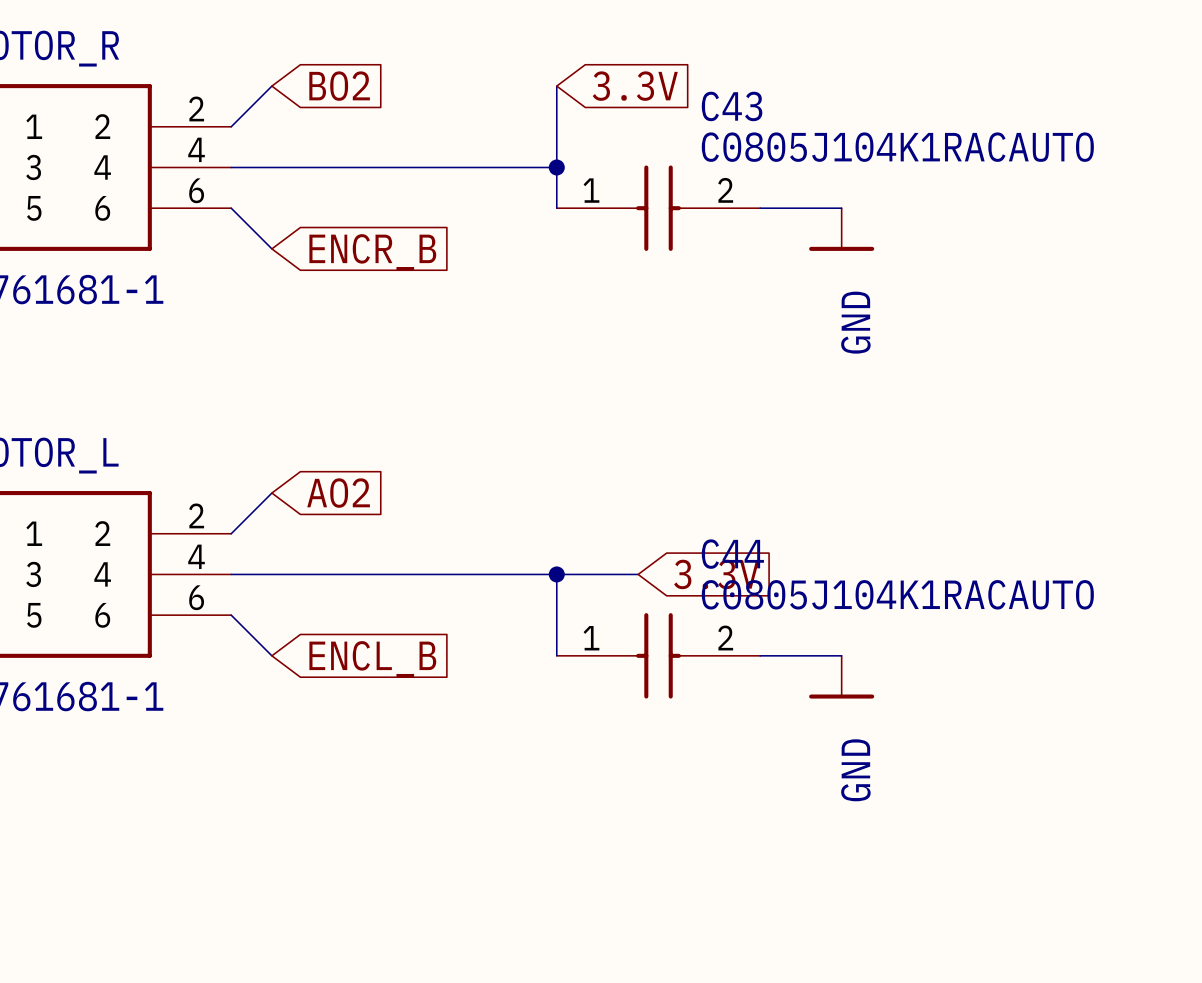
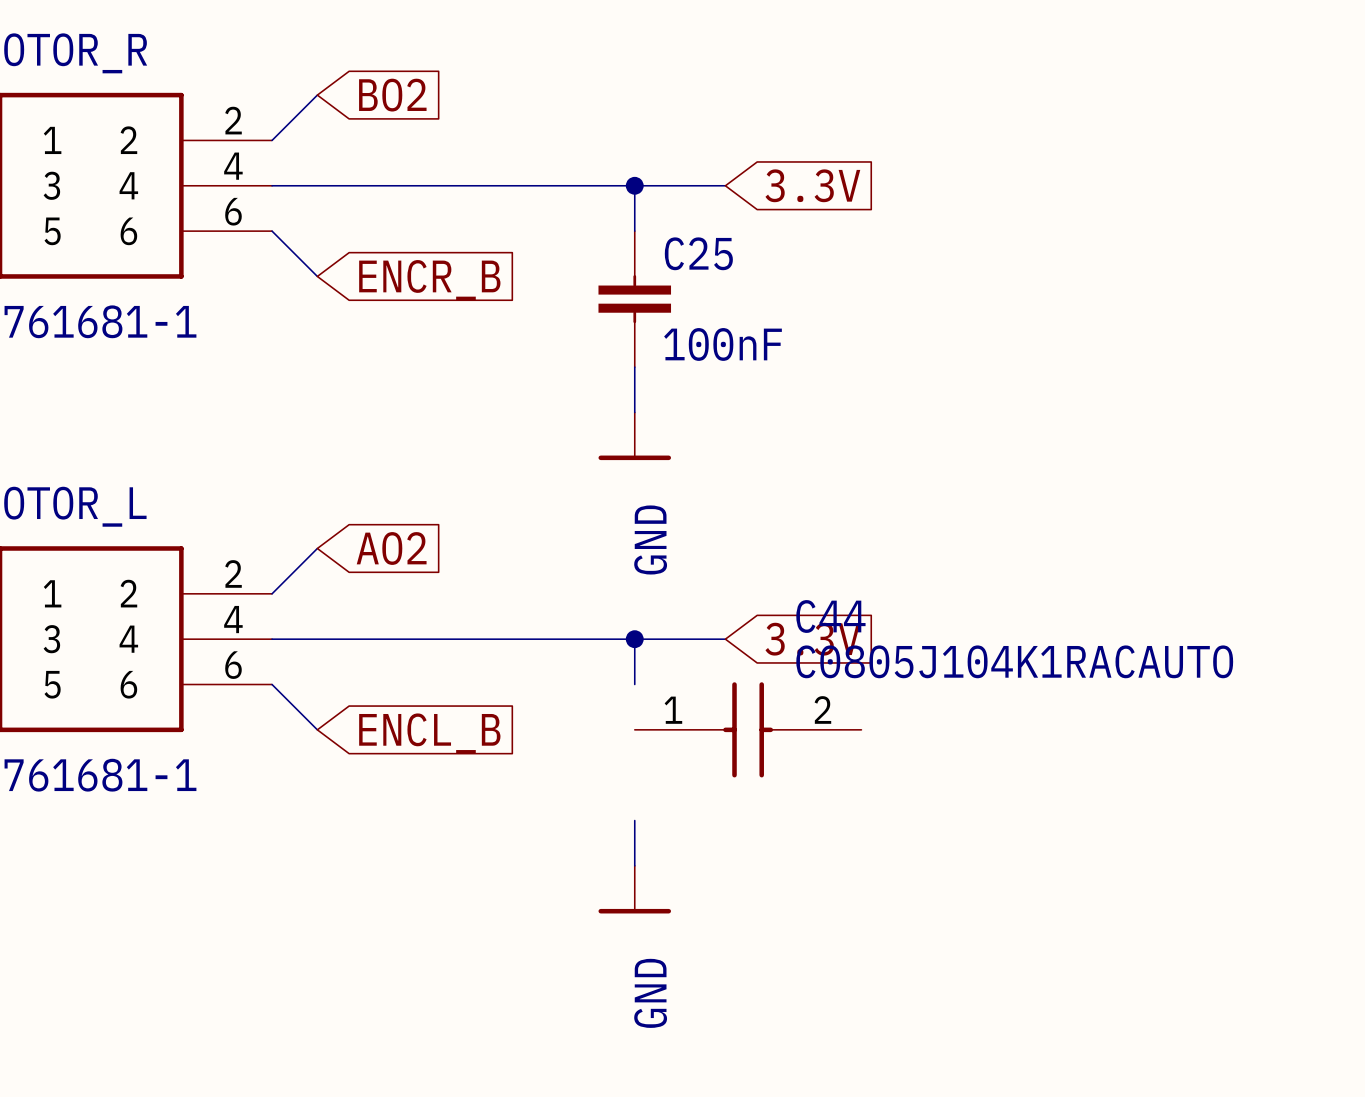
wire: (556, 86) (556, 167) -> (725, 185) (634, 185)
global label position: 3.3V (635, 86) -> 3.3V (812, 185)
C43: C0805J104K1RACAUTO (658, 208) -> none
wire: (760, 208) (841, 208) -> none
power symbol: GND (841, 229) -> none
C25: none -> 100nF (634, 299)
wire: none -> (634, 367) (634, 412)
power symbol: none -> GND (634, 436)
wire: (556, 615) (556, 655) -> (634, 820) (634, 865)
wire: (760, 655) (841, 655) -> none
power symbol: GND (841, 677) -> none
power symbol: none -> GND (634, 889)

